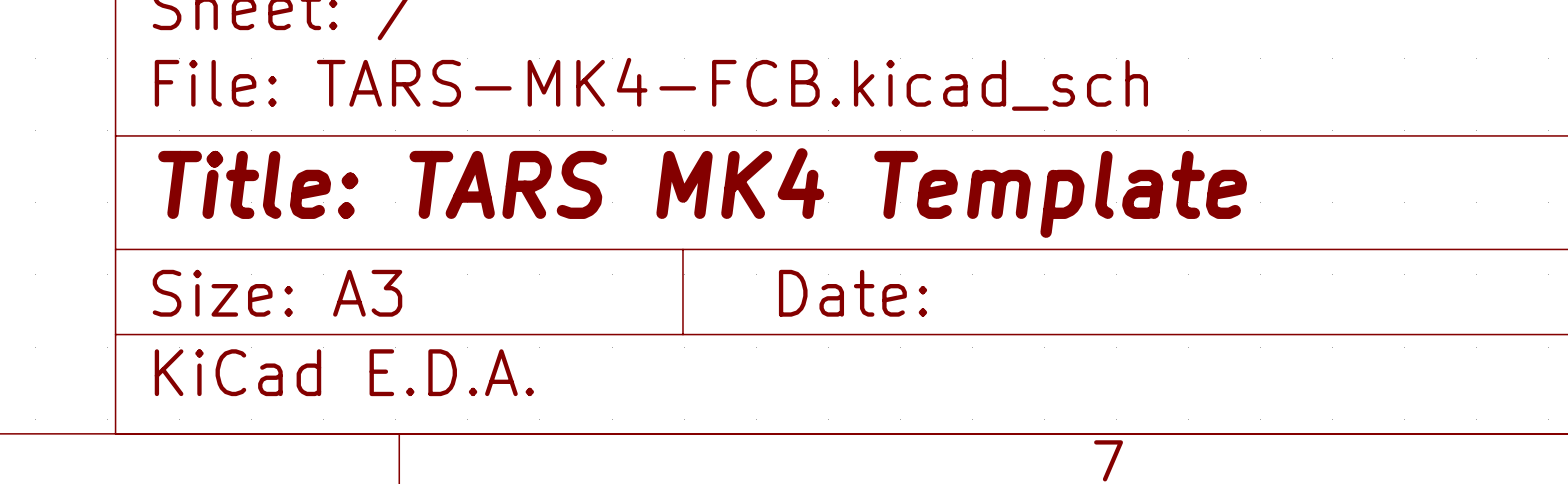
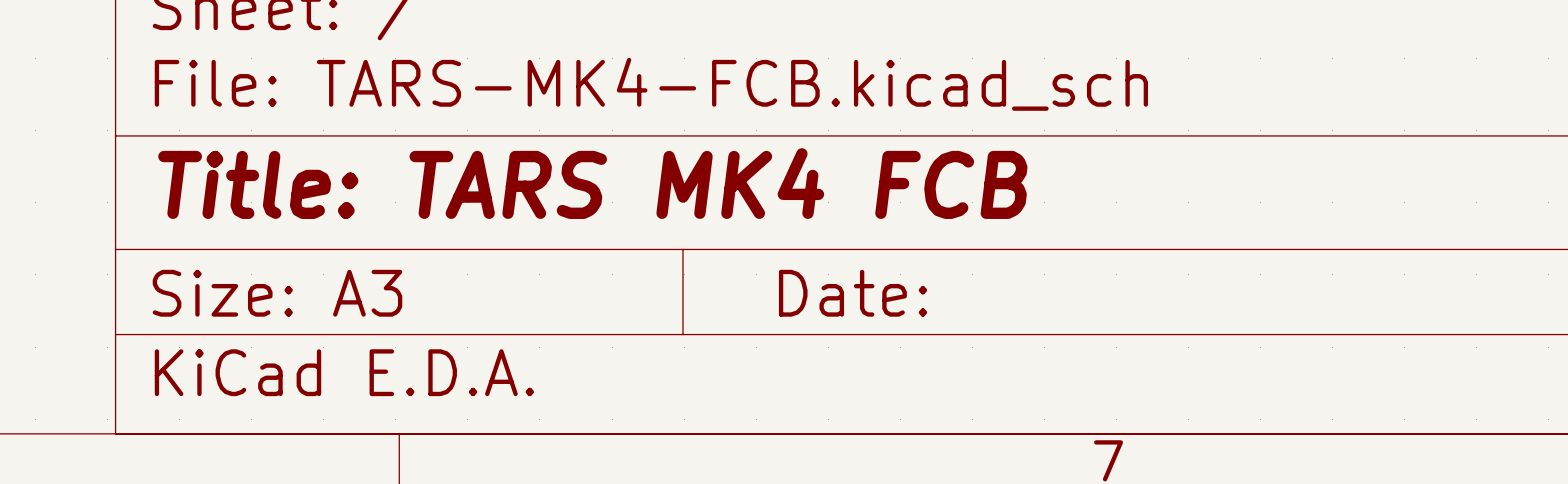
title block: Title: TARS MK4 Template (702, 193) -> Title: TARS MK4 FCB (592, 183)

